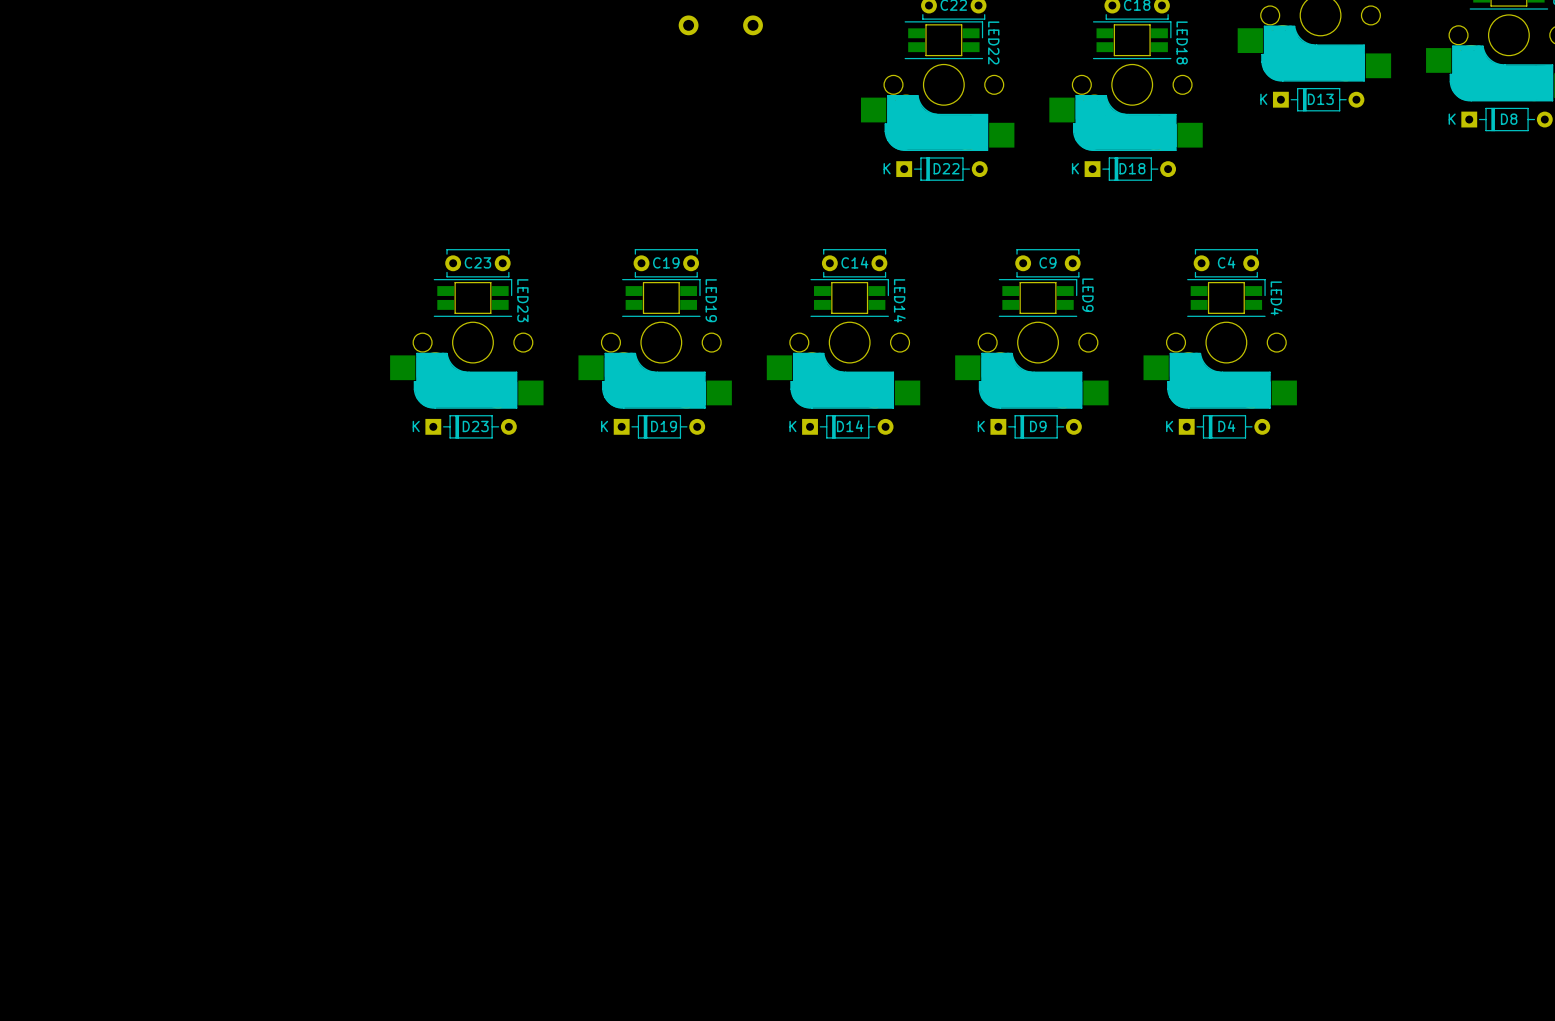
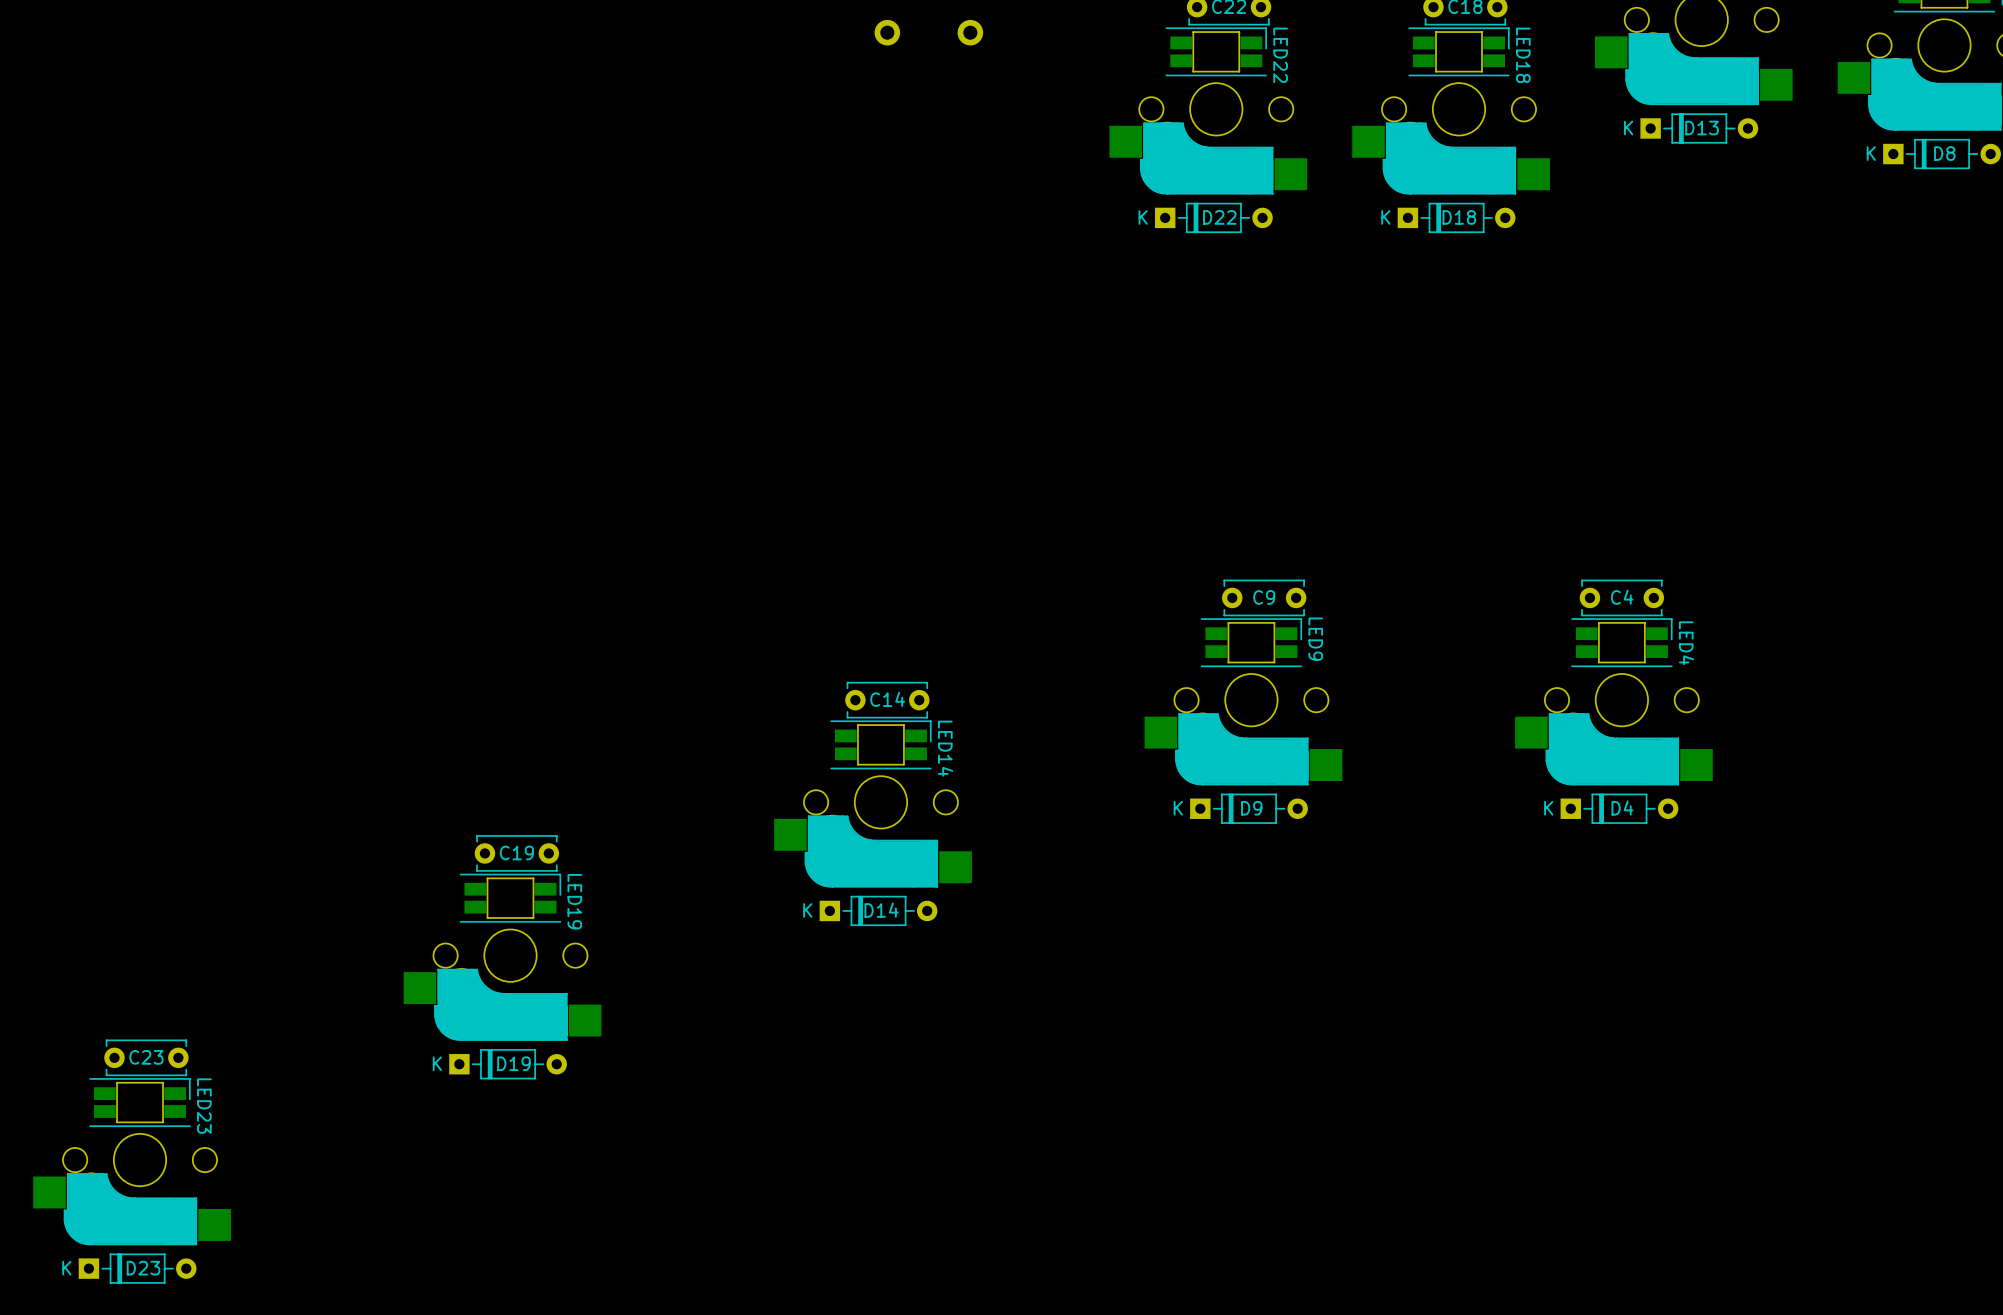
C23 position: (477, 263) -> (146, 1057)
C19 position: (666, 263) -> (516, 853)
C14 position: (854, 263) -> (887, 700)
C9 position: (1047, 263) -> (1264, 597)
C4 position: (1226, 263) -> (1621, 597)
LED23 position: (472, 297) -> (140, 1102)
LED19 position: (661, 297) -> (510, 898)
LED14 position: (849, 297) -> (880, 744)
LED9 position: (1038, 297) -> (1251, 642)
LED4 position: (1226, 297) -> (1621, 642)
part: (466, 365) -> none
part: (655, 365) -> none
part: (843, 365) -> none
part: (1031, 365) -> none
part: (1220, 365) -> none
D23 position: (471, 426) -> (137, 1268)
D19 position: (659, 426) -> (508, 1064)
D14 position: (847, 426) -> (878, 910)
D9 position: (1036, 426) -> (1248, 808)
D4 position: (1224, 426) -> (1619, 808)
part: none -> (1243, 729)
part: none -> (1613, 729)
part: none -> (873, 831)
part: none -> (502, 985)
part: none -> (132, 1189)

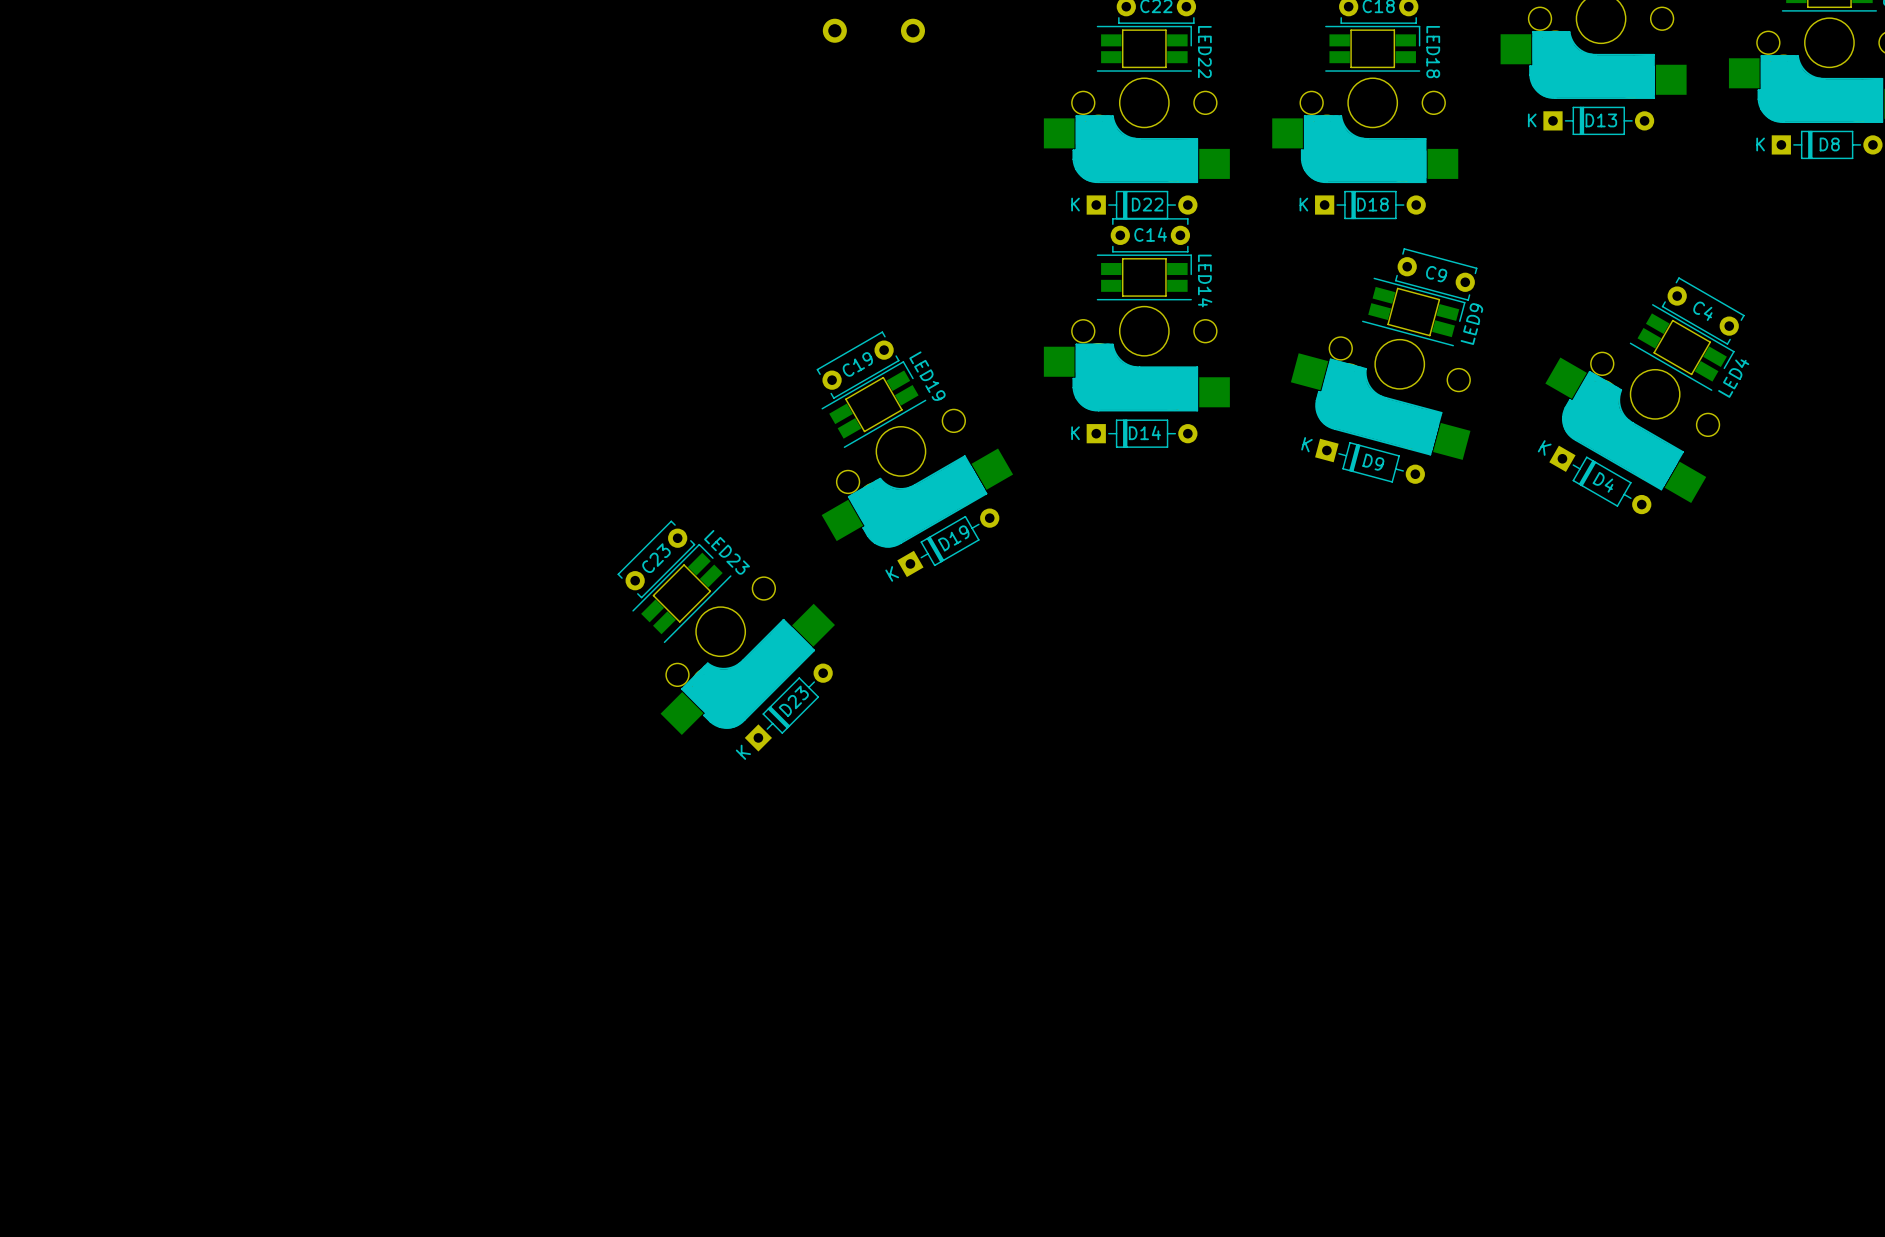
part: none -> (1136, 359)
part: none -> (1380, 398)
part: none -> (1632, 427)
part: none -> (917, 478)
C9 rotation: 0° (1264, 597) -> 15° clockwise (1436, 274)
C9 position: (1264, 597) -> (1436, 274)
C4 rotation: 0° (1621, 597) -> 30° clockwise (1703, 311)
C4 position: (1621, 597) -> (1703, 311)
LED9 rotation: 0° (1251, 642) -> 15° clockwise (1413, 312)
LED9 position: (1251, 642) -> (1413, 312)
LED4 rotation: 0° (1621, 642) -> 30° clockwise (1682, 347)
LED4 position: (1621, 642) -> (1682, 347)
part: none -> (747, 656)
C14 position: (887, 700) -> (1150, 235)
part: (1243, 729) -> none
part: (1613, 729) -> none
LED14 position: (880, 744) -> (1144, 277)
D4 footprint: [1560, 793, 1679, 824] -> [1549, 445, 1652, 515]
D9 rotation: 0° (1248, 808) -> 15° clockwise (1370, 461)
D9 position: (1248, 808) -> (1370, 461)
part: (873, 831) -> none
C19 rotation: 0° (516, 853) -> 30° counterclockwise (858, 365)
C19 position: (516, 853) -> (858, 365)
LED19 rotation: 0° (510, 898) -> 30° counterclockwise (873, 404)
LED19 position: (510, 898) -> (873, 404)
D14 position: (878, 910) -> (1142, 433)
part: (502, 985) -> none
C23 rotation: 0° (146, 1057) -> 45° counterclockwise (656, 559)
C23 position: (146, 1057) -> (656, 559)
D19 rotation: 0° (508, 1064) -> 30° counterclockwise (948, 542)
D19 position: (508, 1064) -> (948, 542)
LED23 rotation: 0° (140, 1102) -> 45° counterclockwise (681, 593)
LED23 position: (140, 1102) -> (681, 593)
part: (132, 1189) -> none
D23 rotation: 0° (137, 1268) -> 45° counterclockwise (788, 707)
D23 position: (137, 1268) -> (788, 707)

